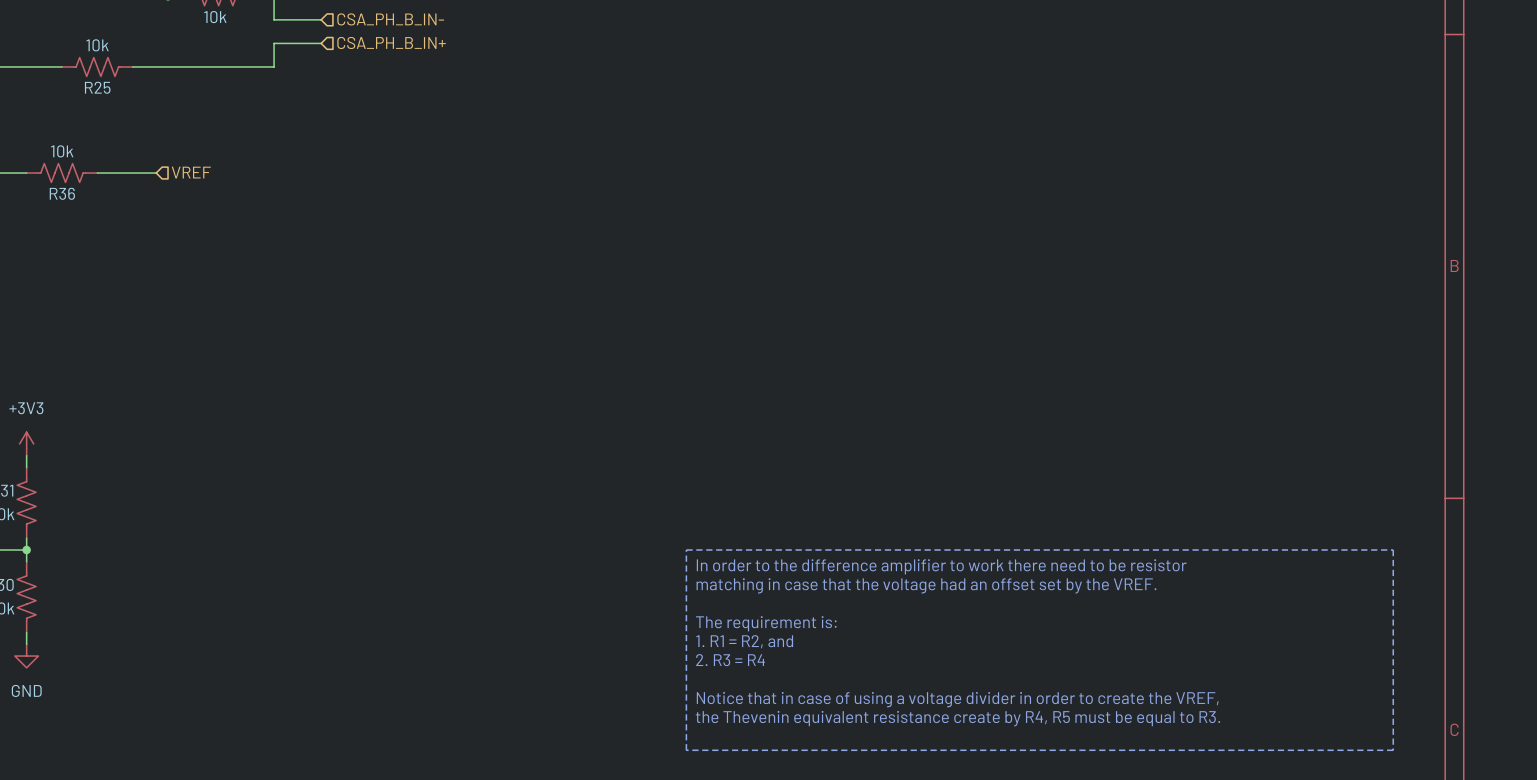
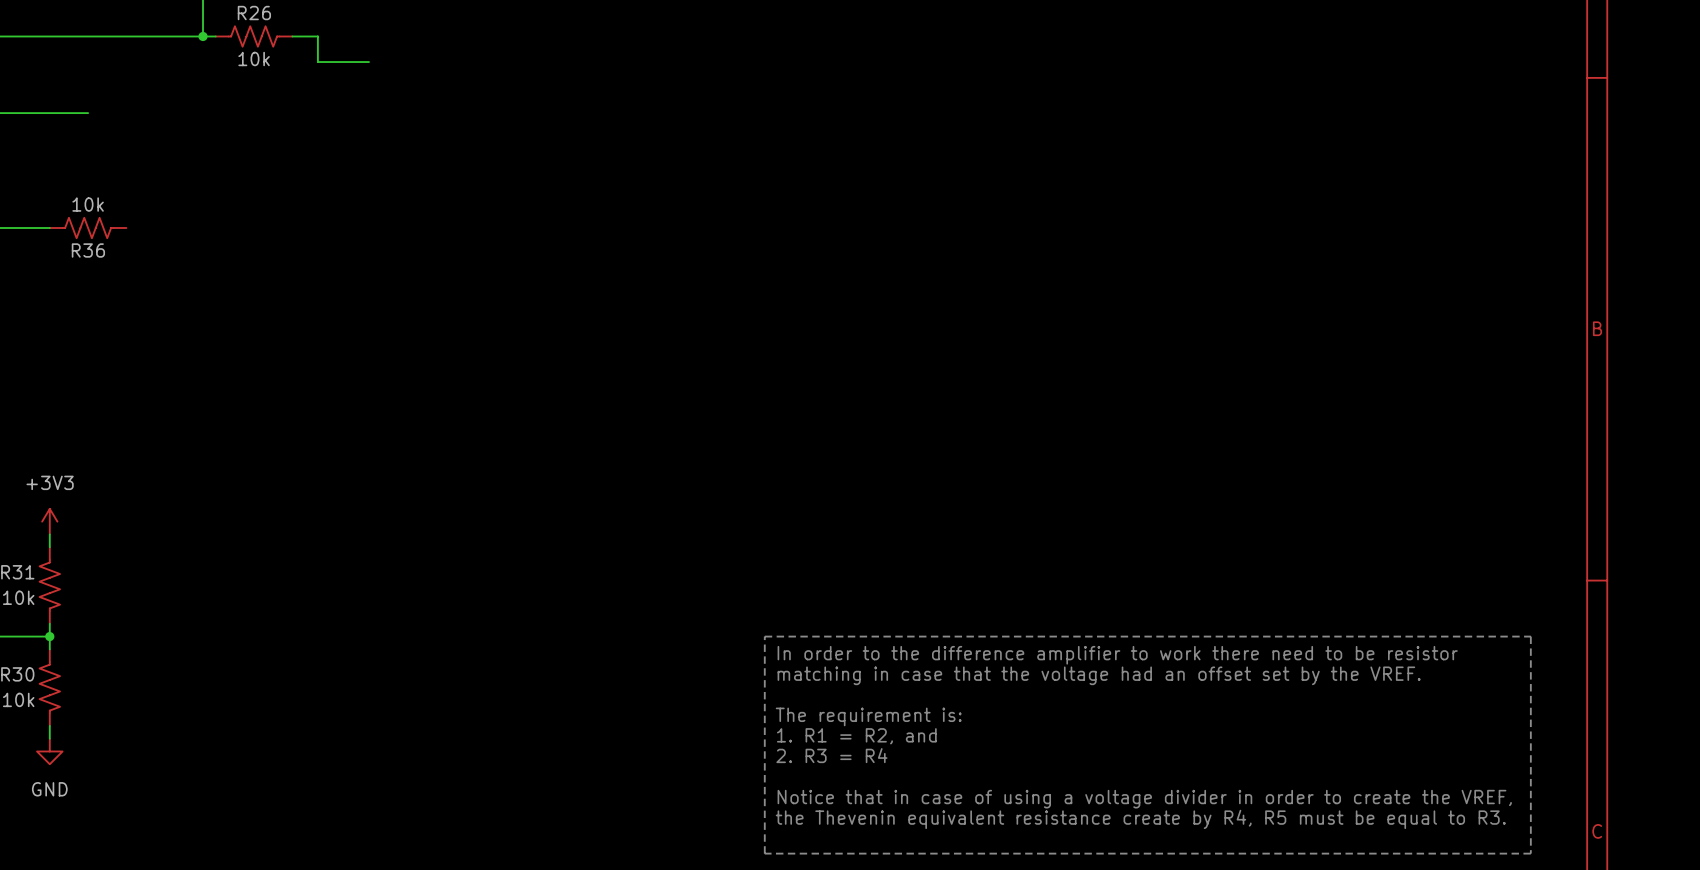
hierarchical label: CSA_PH_B_IN- (390, 19) -> none
hierarchical label: CSA_PH_B_IN+ (391, 42) -> none
wire: (321, 43) (274, 43) (274, 66) (132, 66) -> none
R25: 10k (97, 66) -> none
hierarchical label: VREF (191, 172) -> none
wire: (97, 173) (156, 173) -> none

